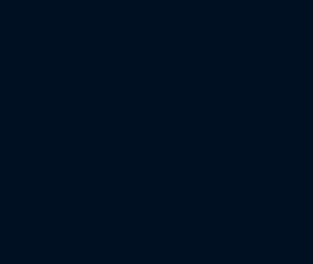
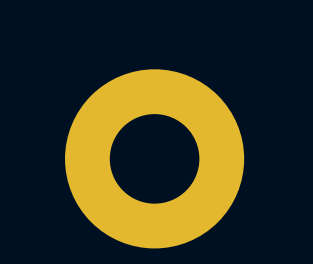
part: none -> (154, 158)

